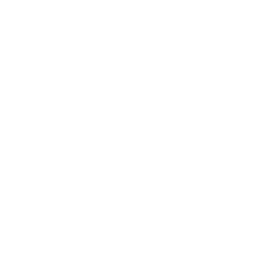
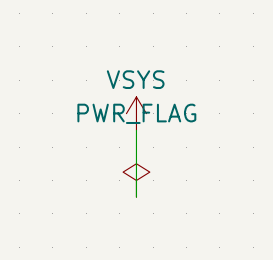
power symbol: none -> VSYS (136, 113)
wire: none -> (136, 130) (136, 197)
power symbol: none -> PWR_FLAG (136, 180)

